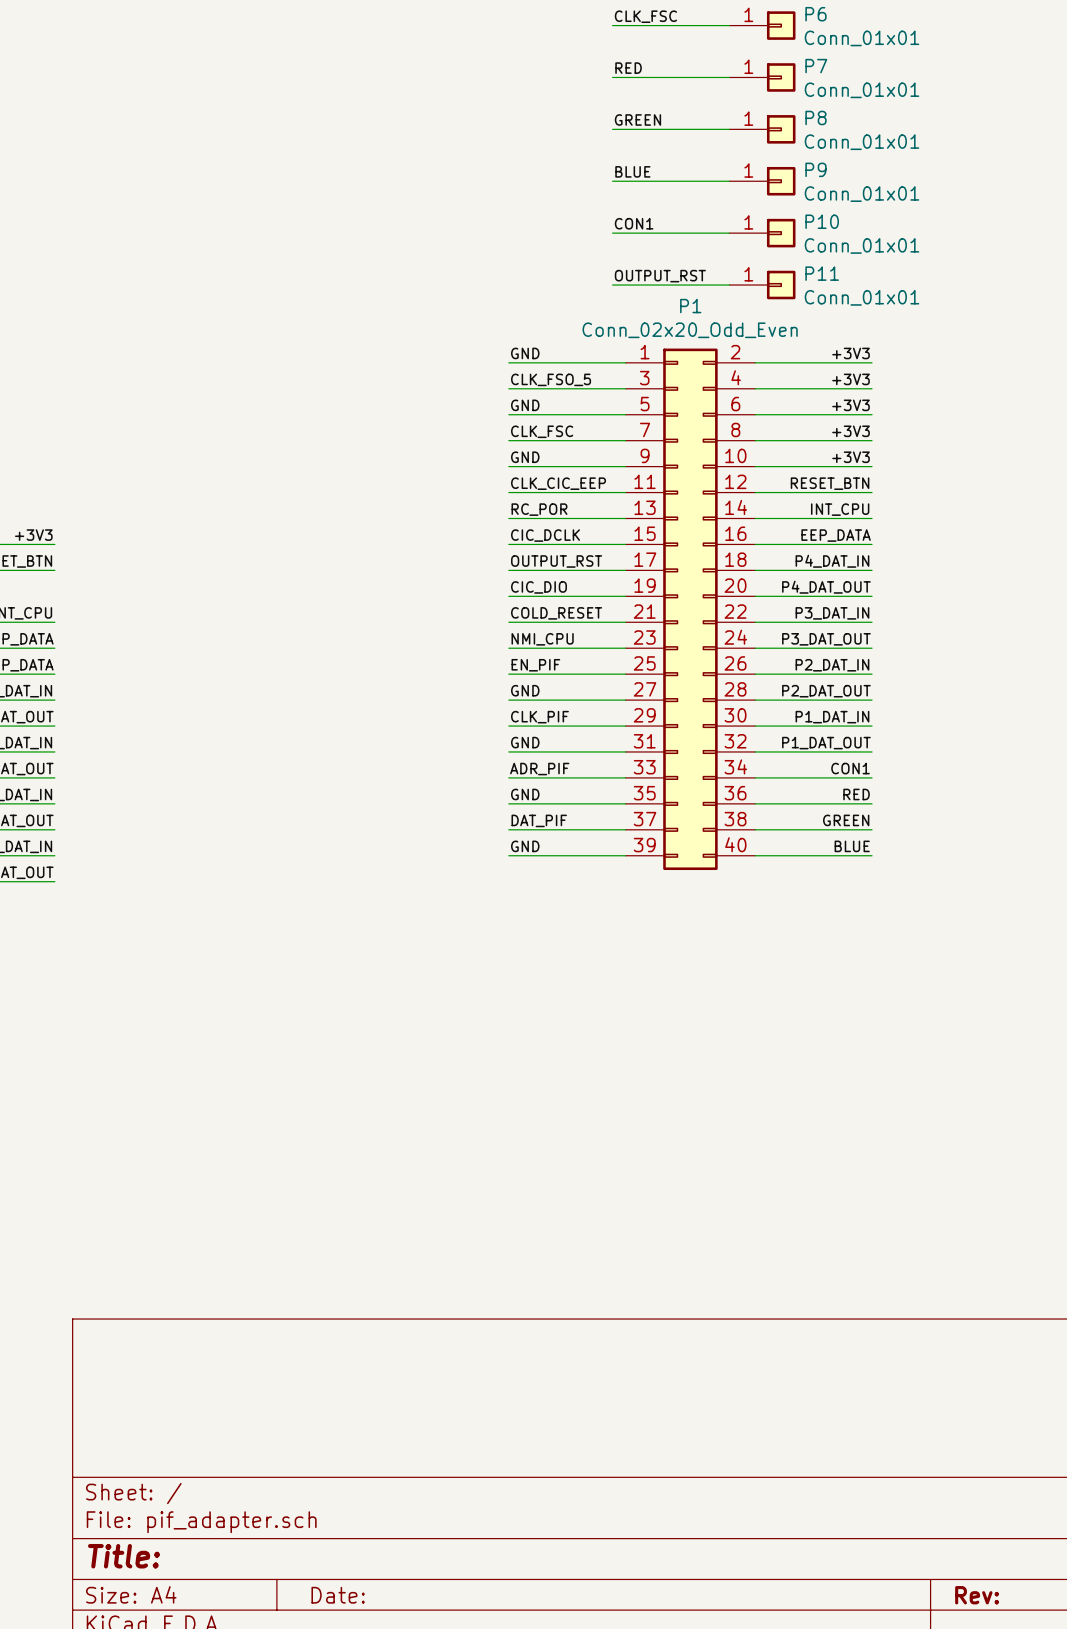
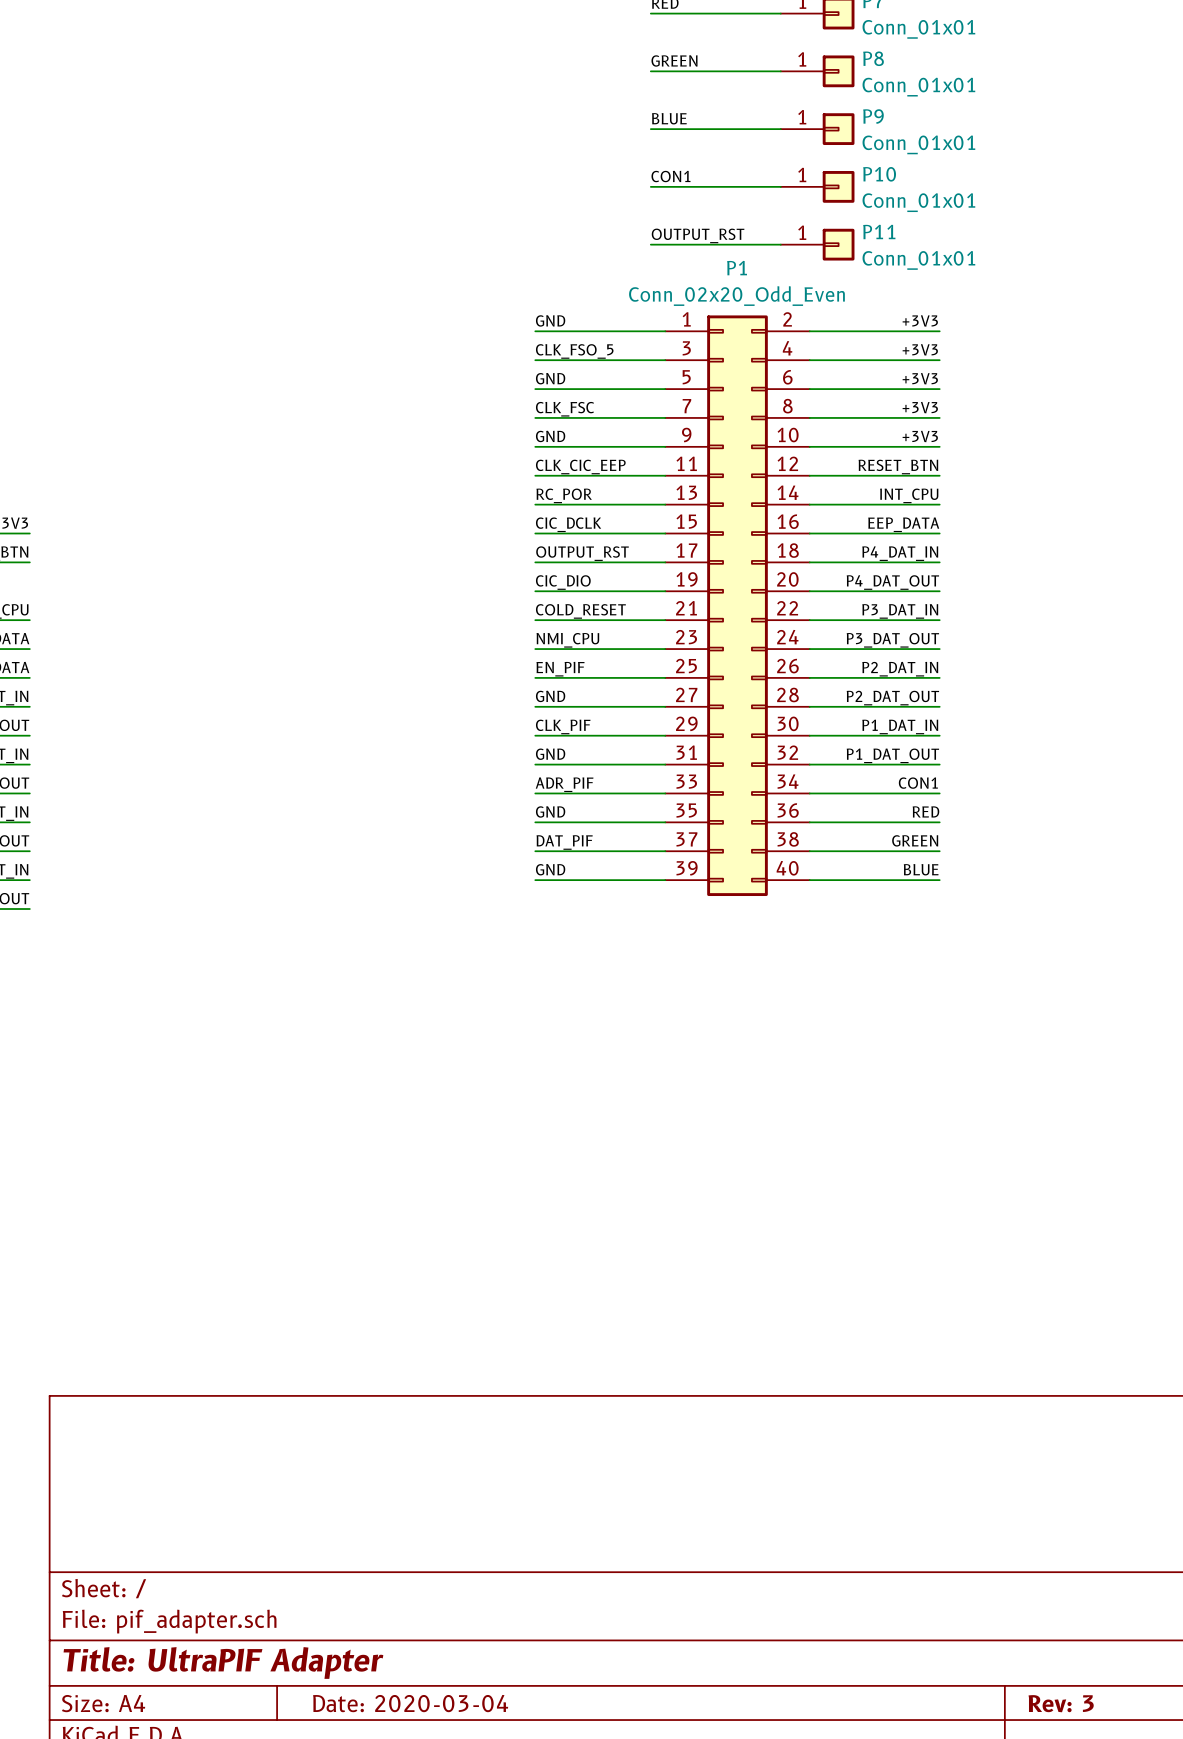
title block: Title: (124, 1556) -> Title: UltraPIF Adapter (223, 1662)
title block: Date: (338, 1595) -> Date: 2020-03-04 (410, 1703)
title block: Rev: (977, 1595) -> Rev: 3 (1061, 1703)

